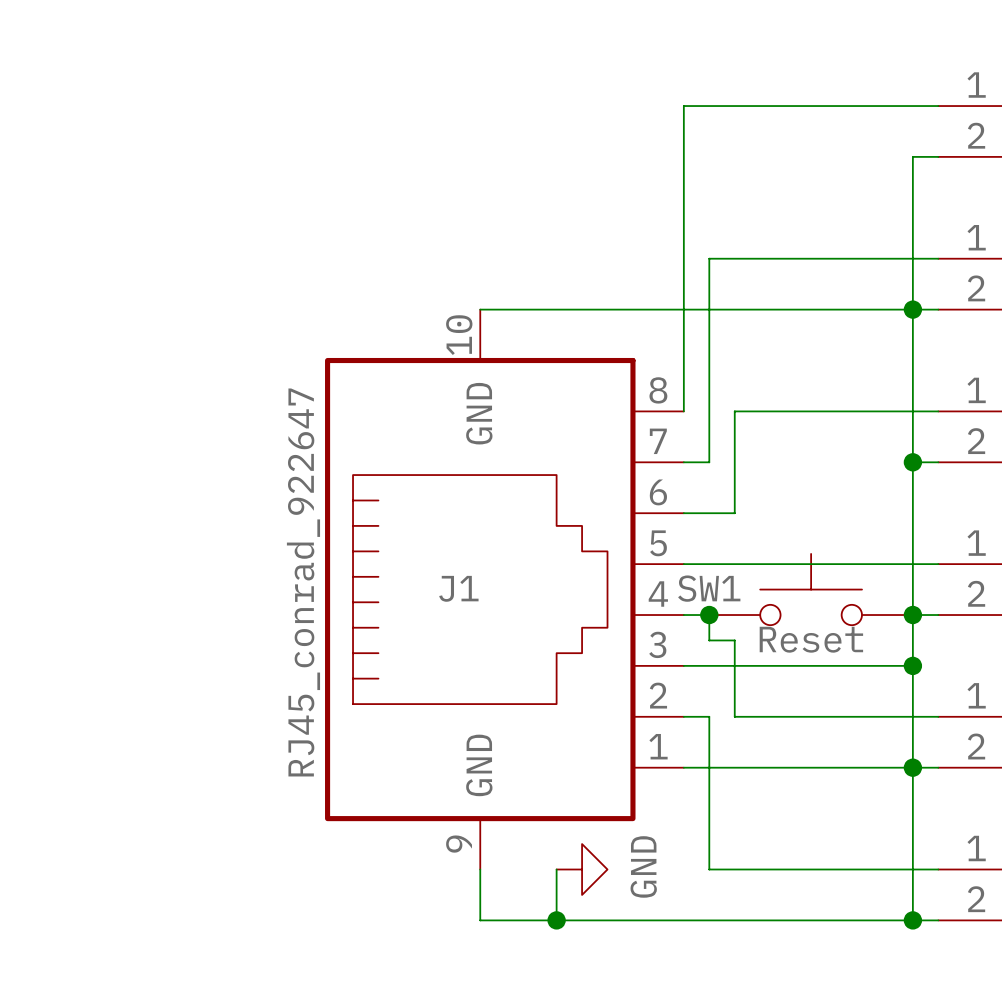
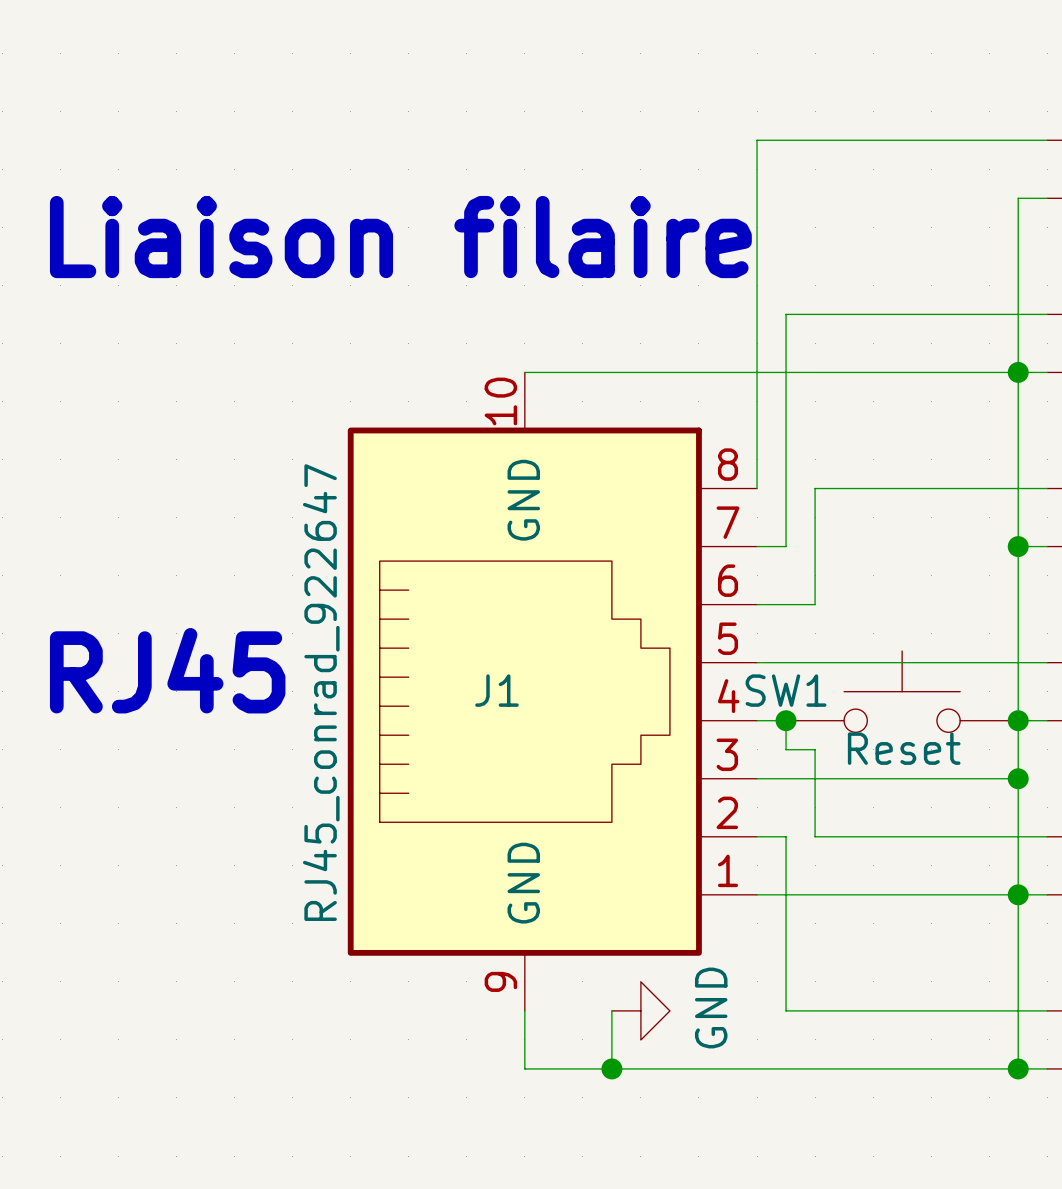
text: none -> Liaison filaire (400, 237)
text: none -> RJ45 (167, 670)

